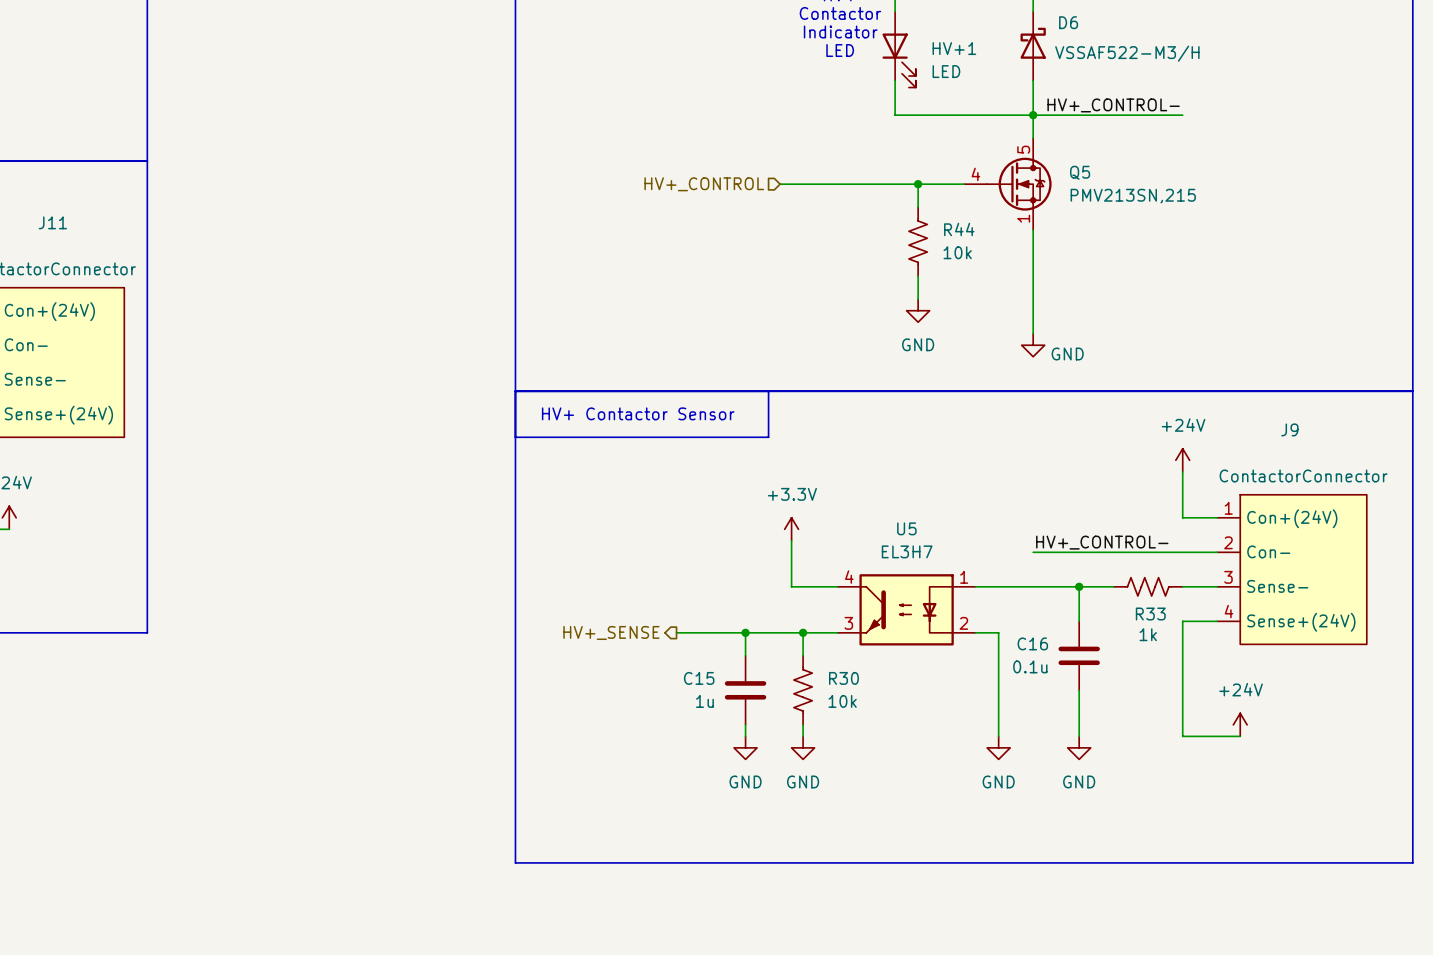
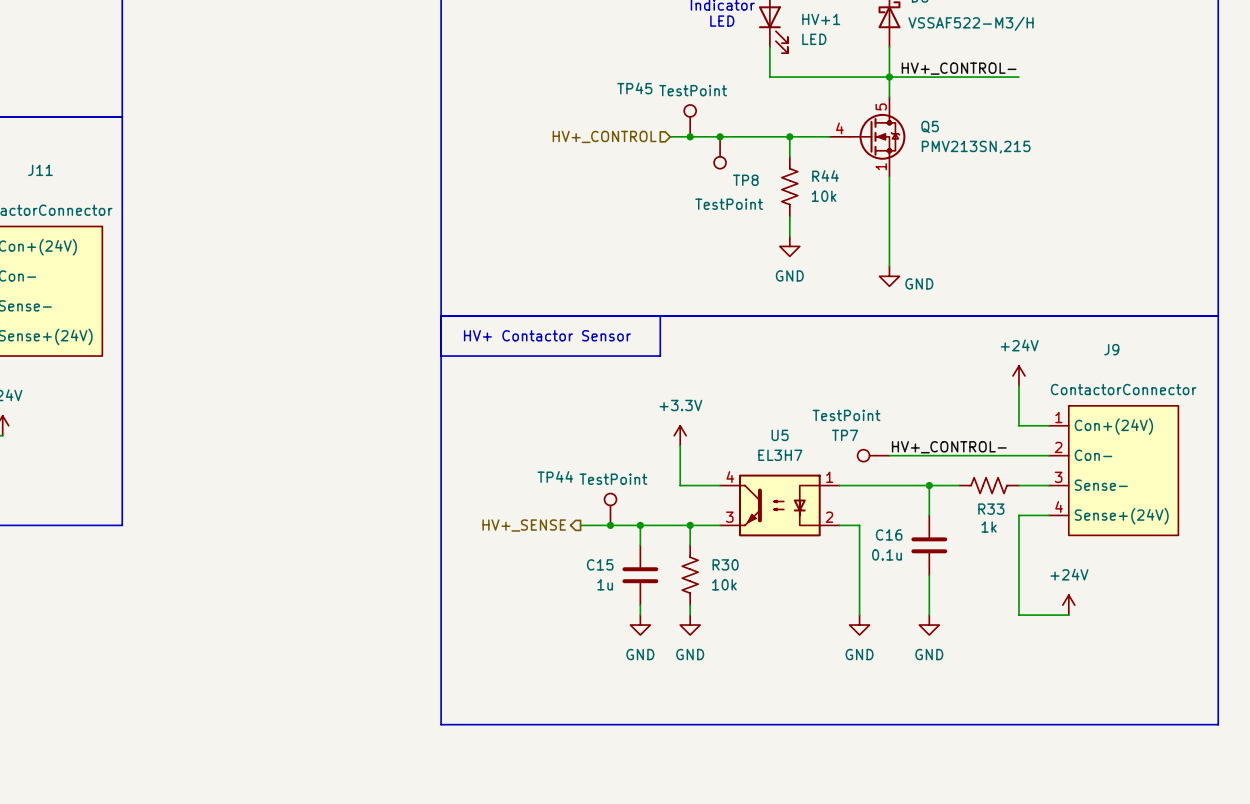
TP45: none -> TestPoint (690, 120)
junction: none -> (690, 136)
junction: none -> (720, 136)
TP8: none -> TestPoint (720, 152)
TP7: none -> TestPoint (873, 455)
TP44: none -> TestPoint (610, 509)
junction: none -> (610, 525)

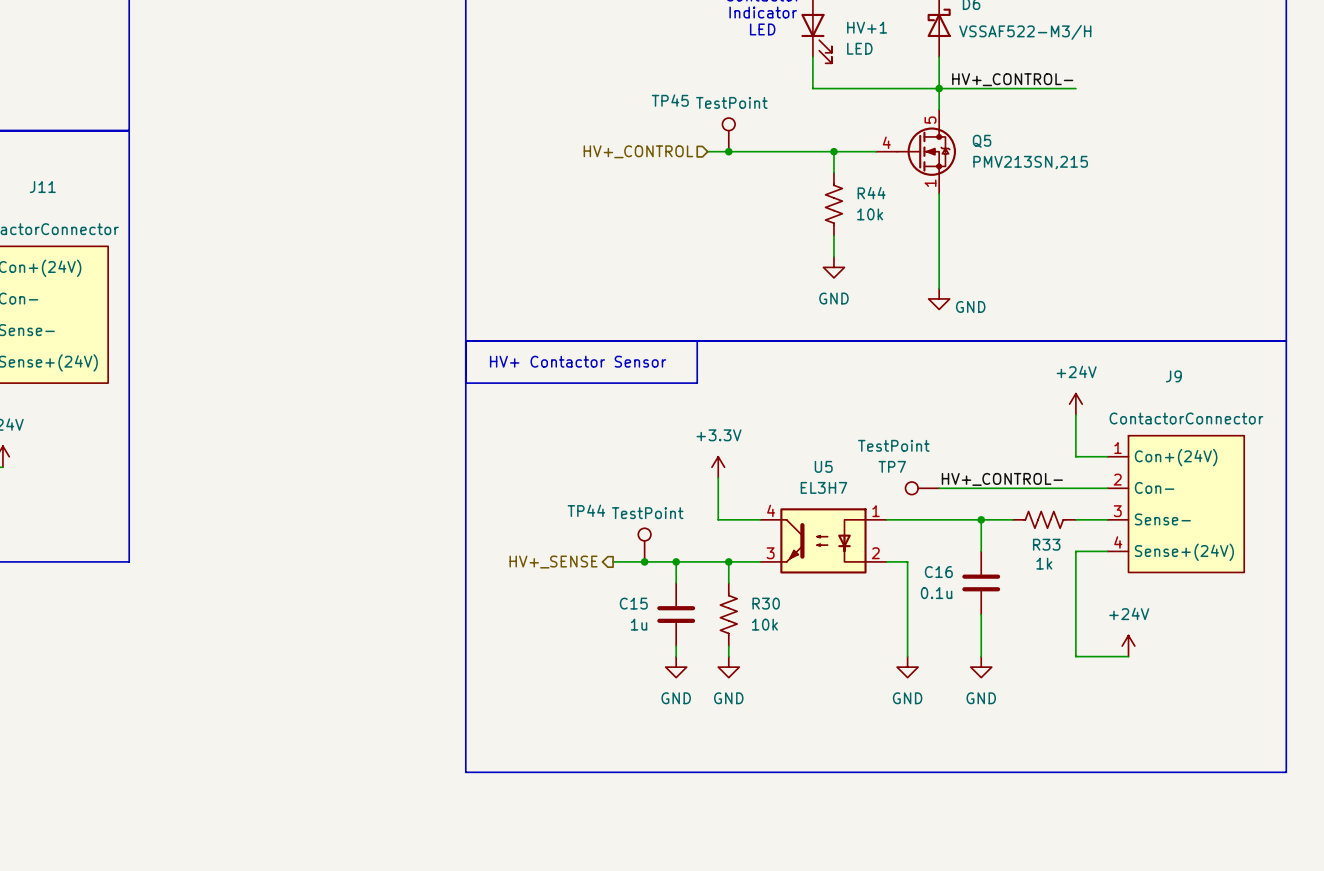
junction: (720, 136) -> none
TP8: TestPoint (720, 152) -> none

